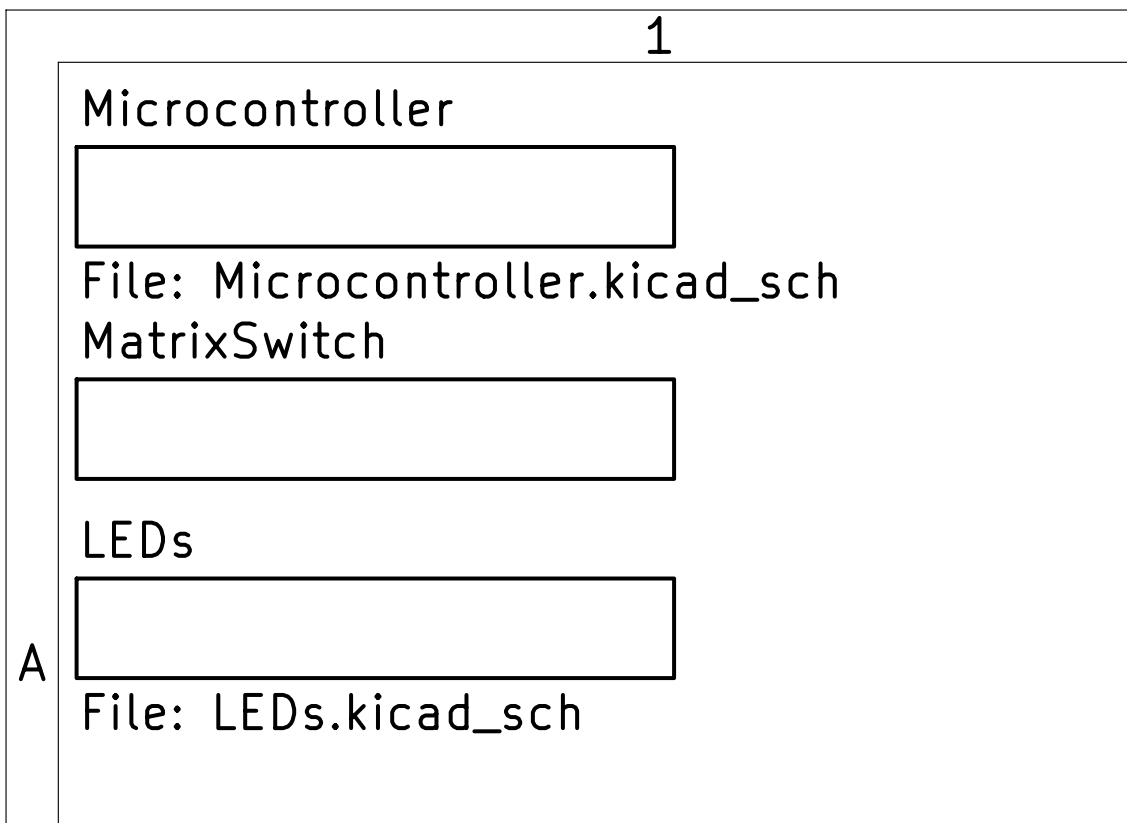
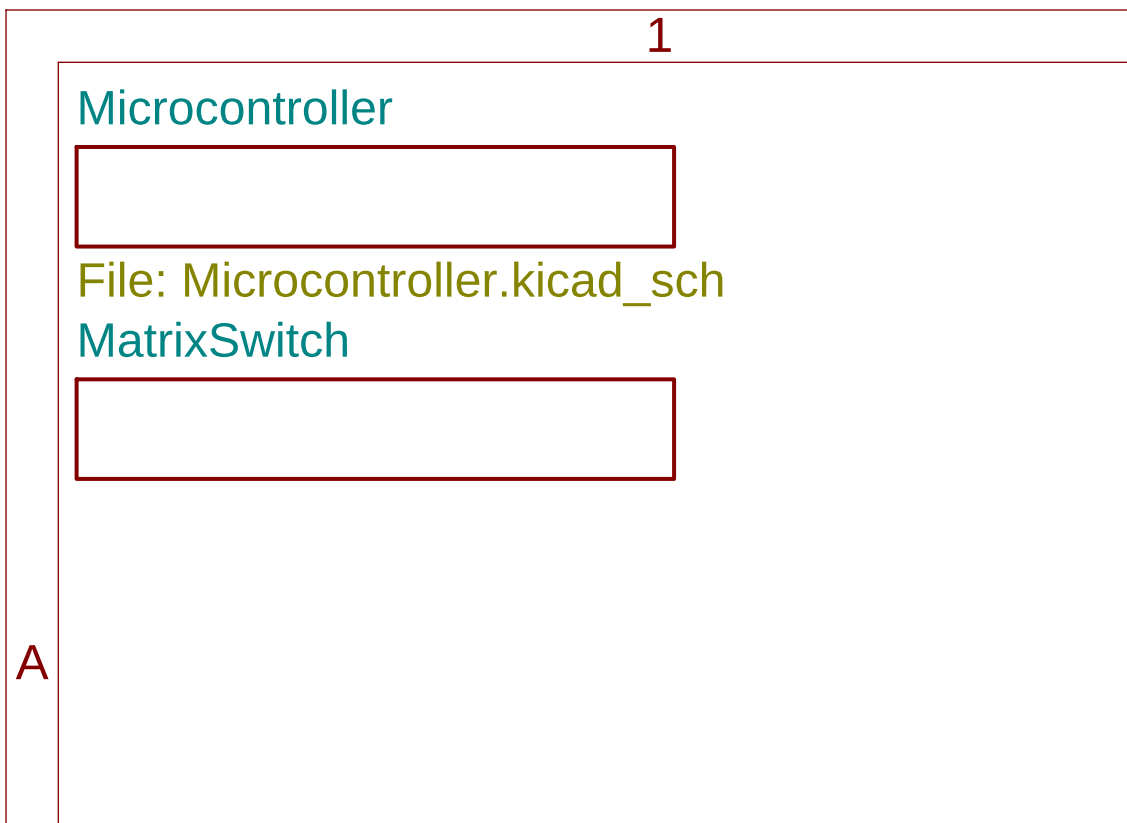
sheet LEDs: File: LEDs.kicad_sch (375, 628) -> none

